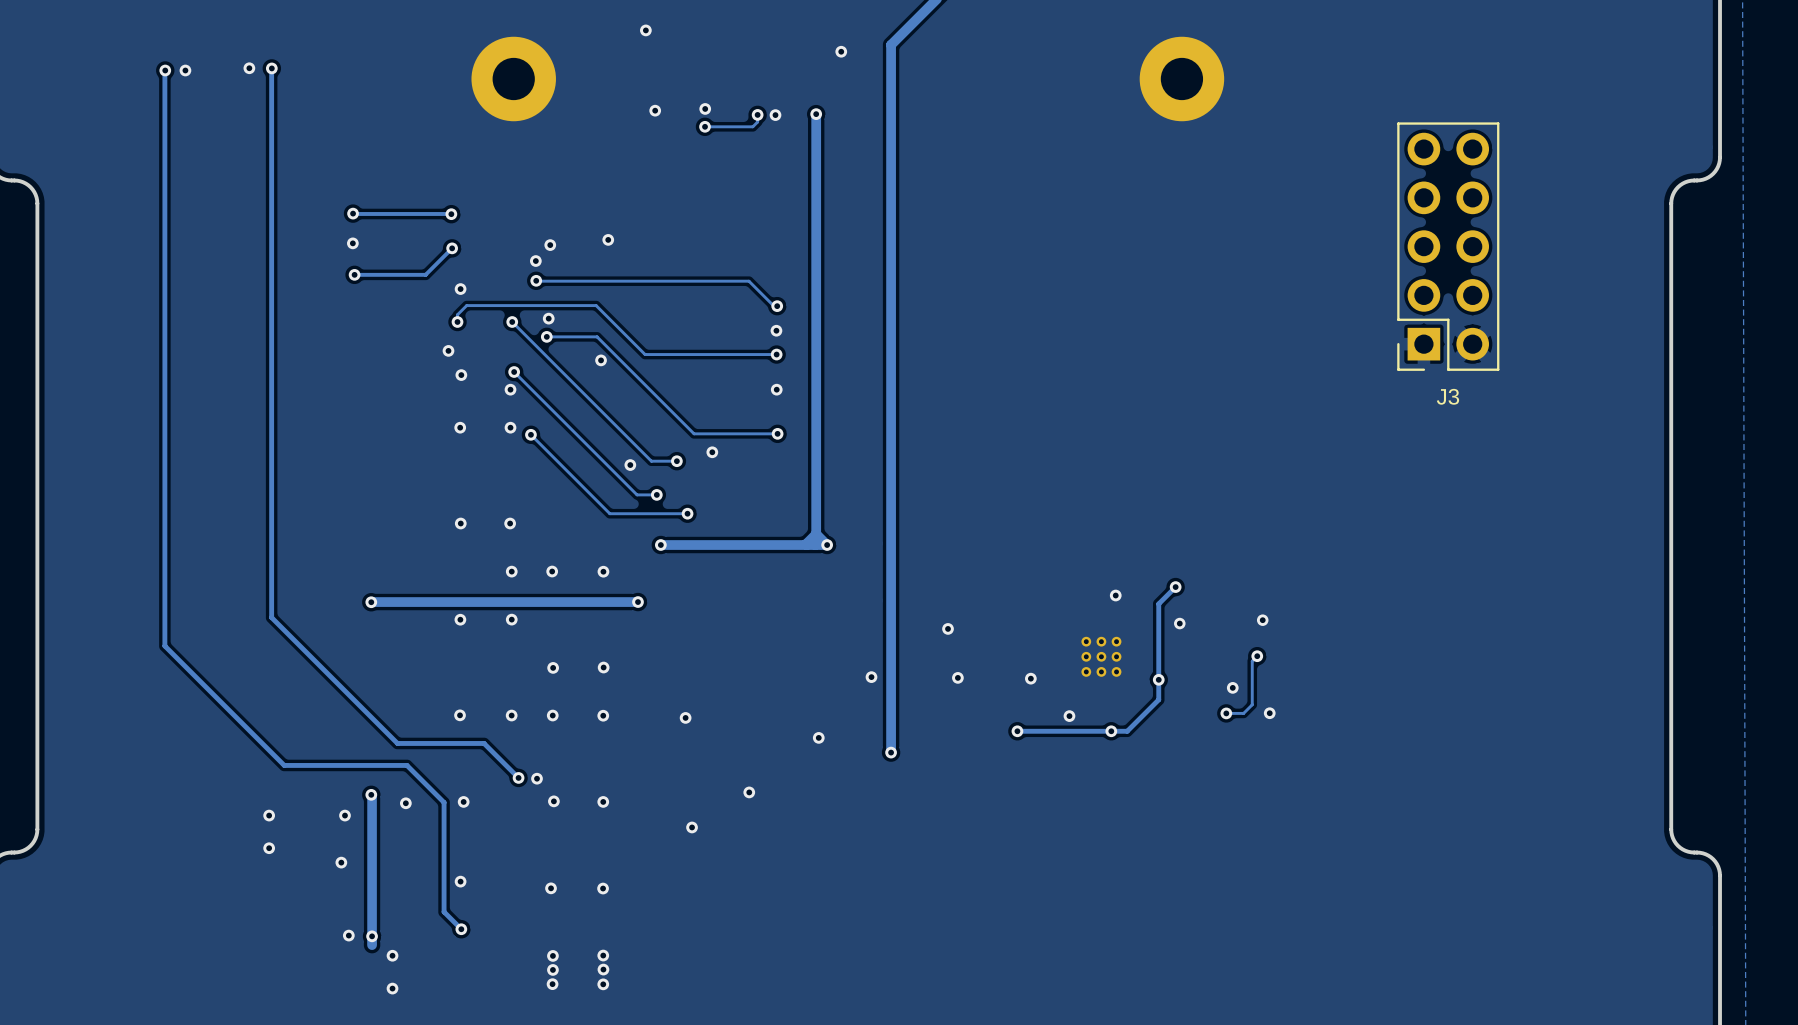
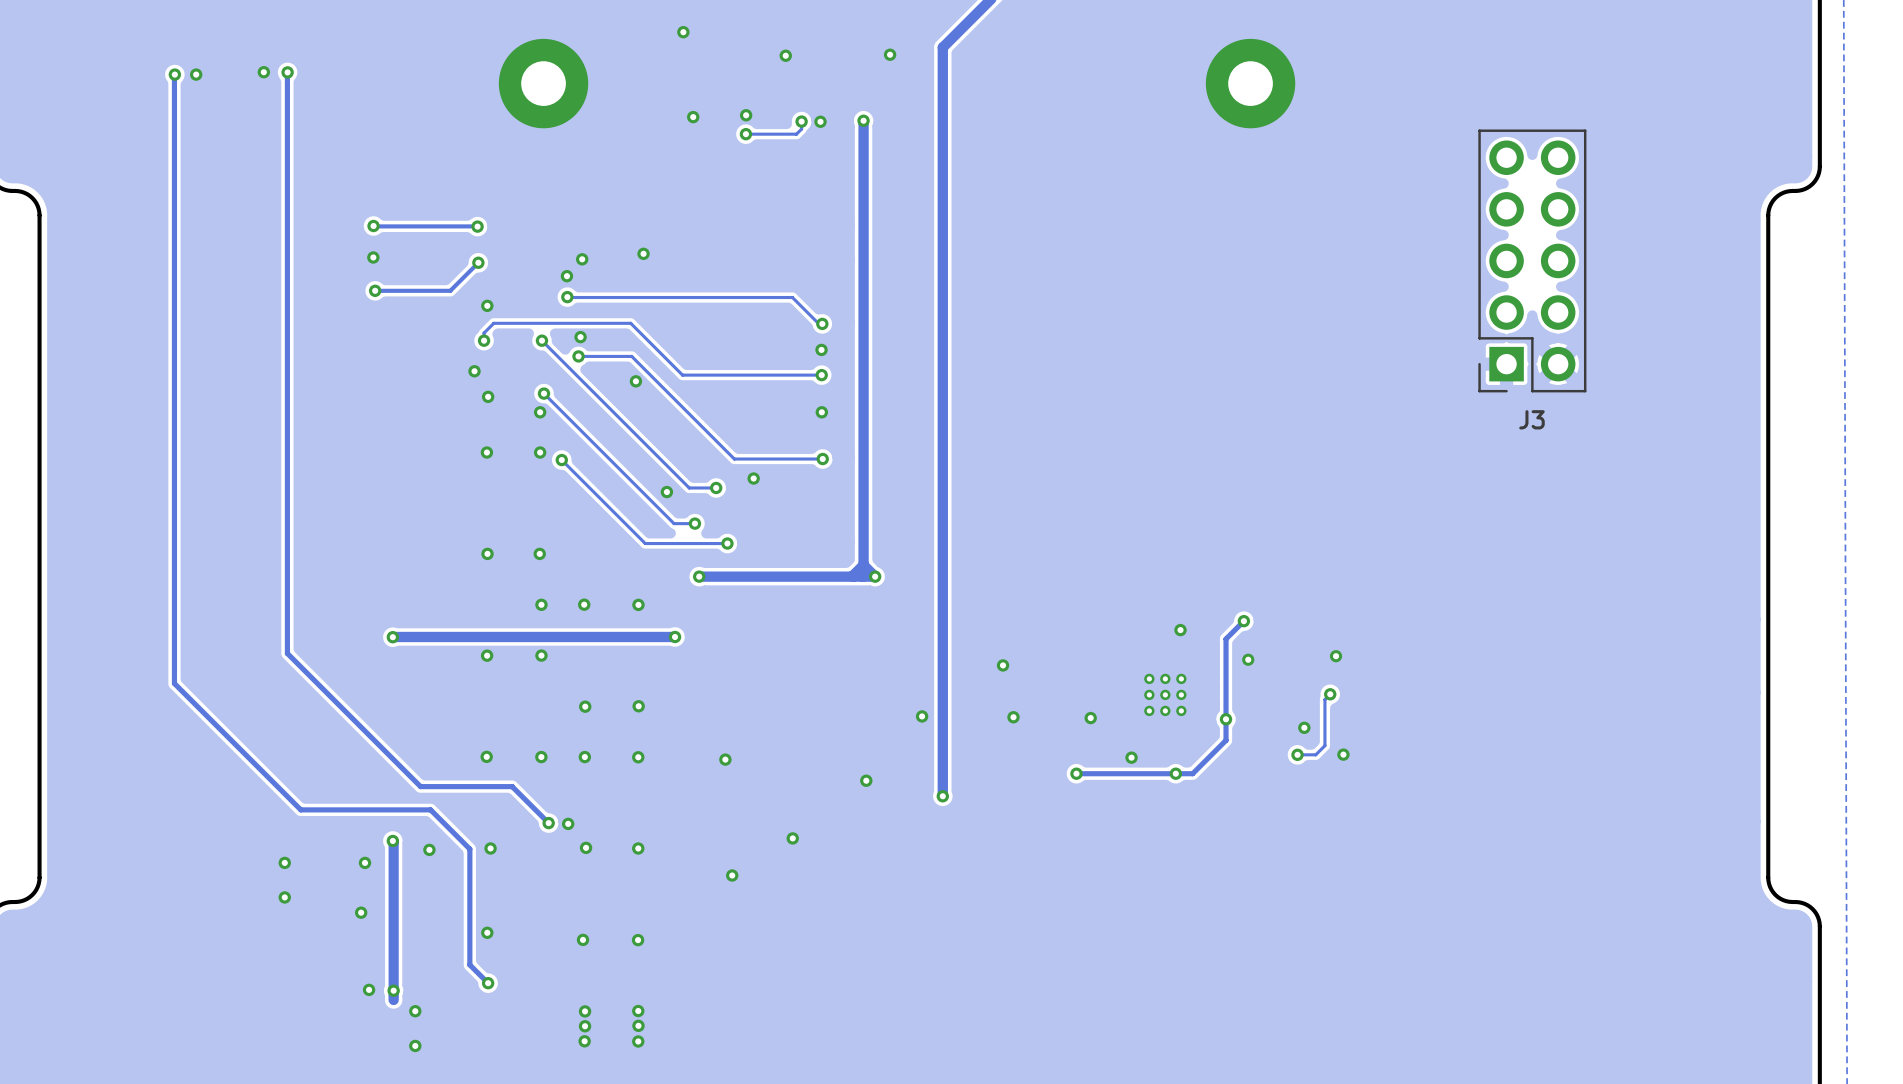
via: none -> (785, 55)

